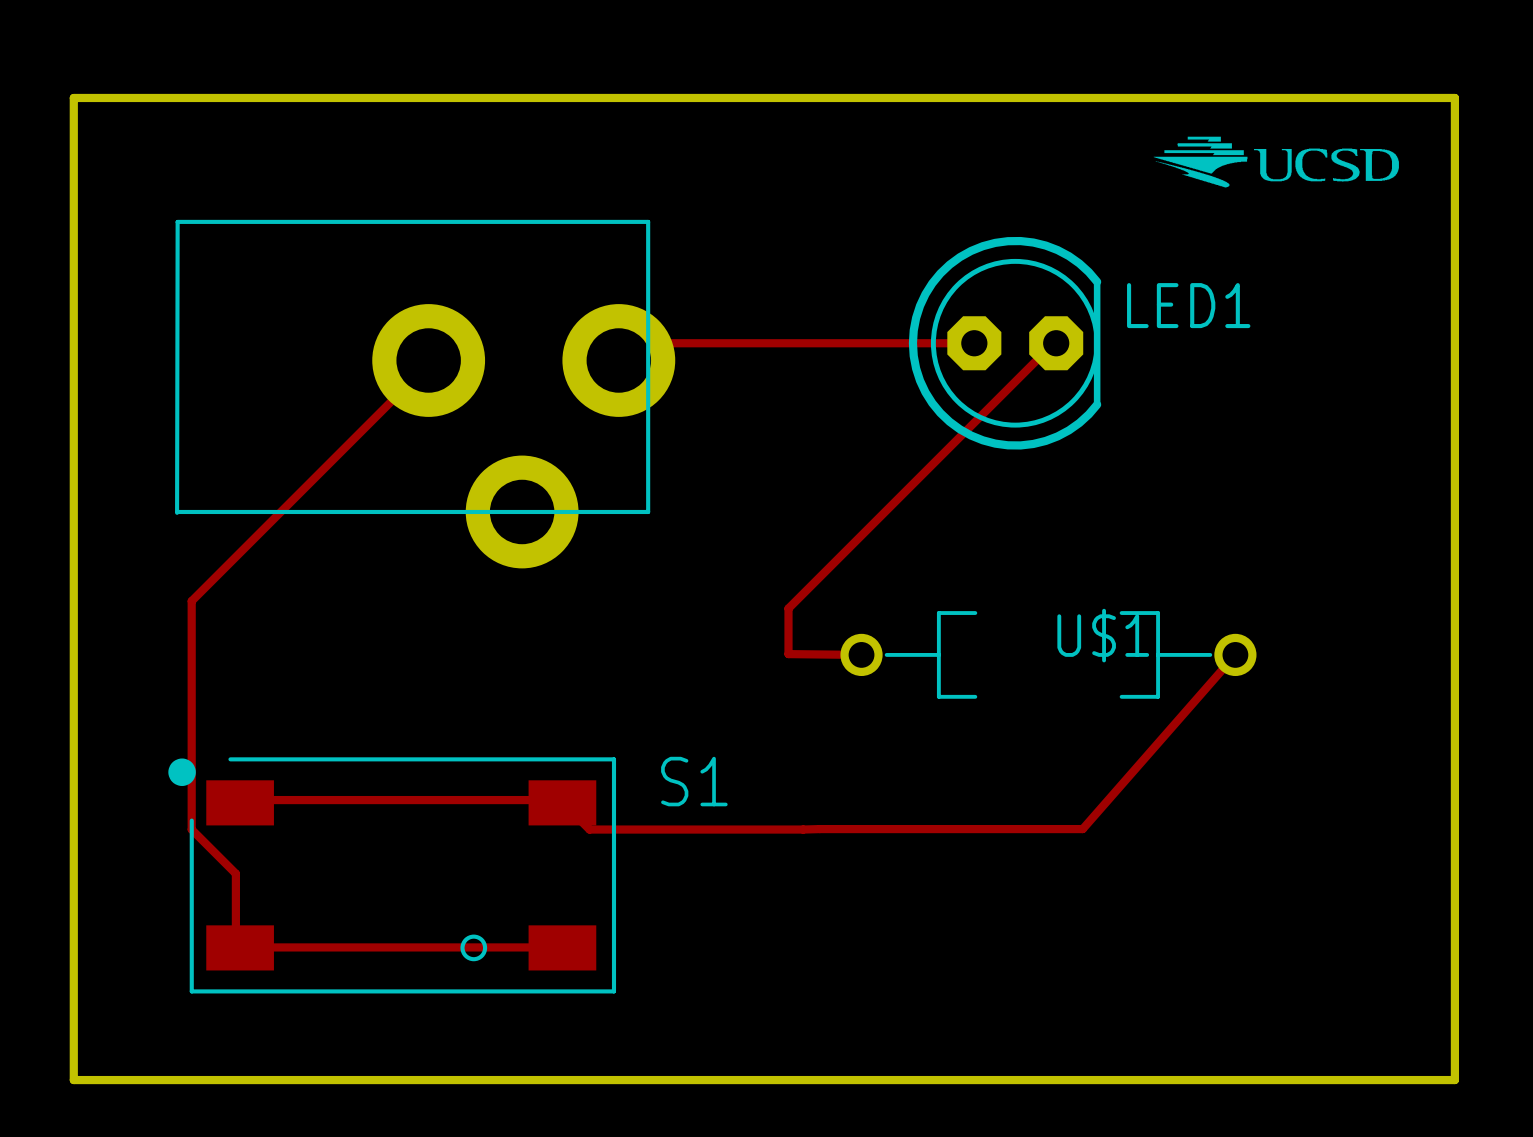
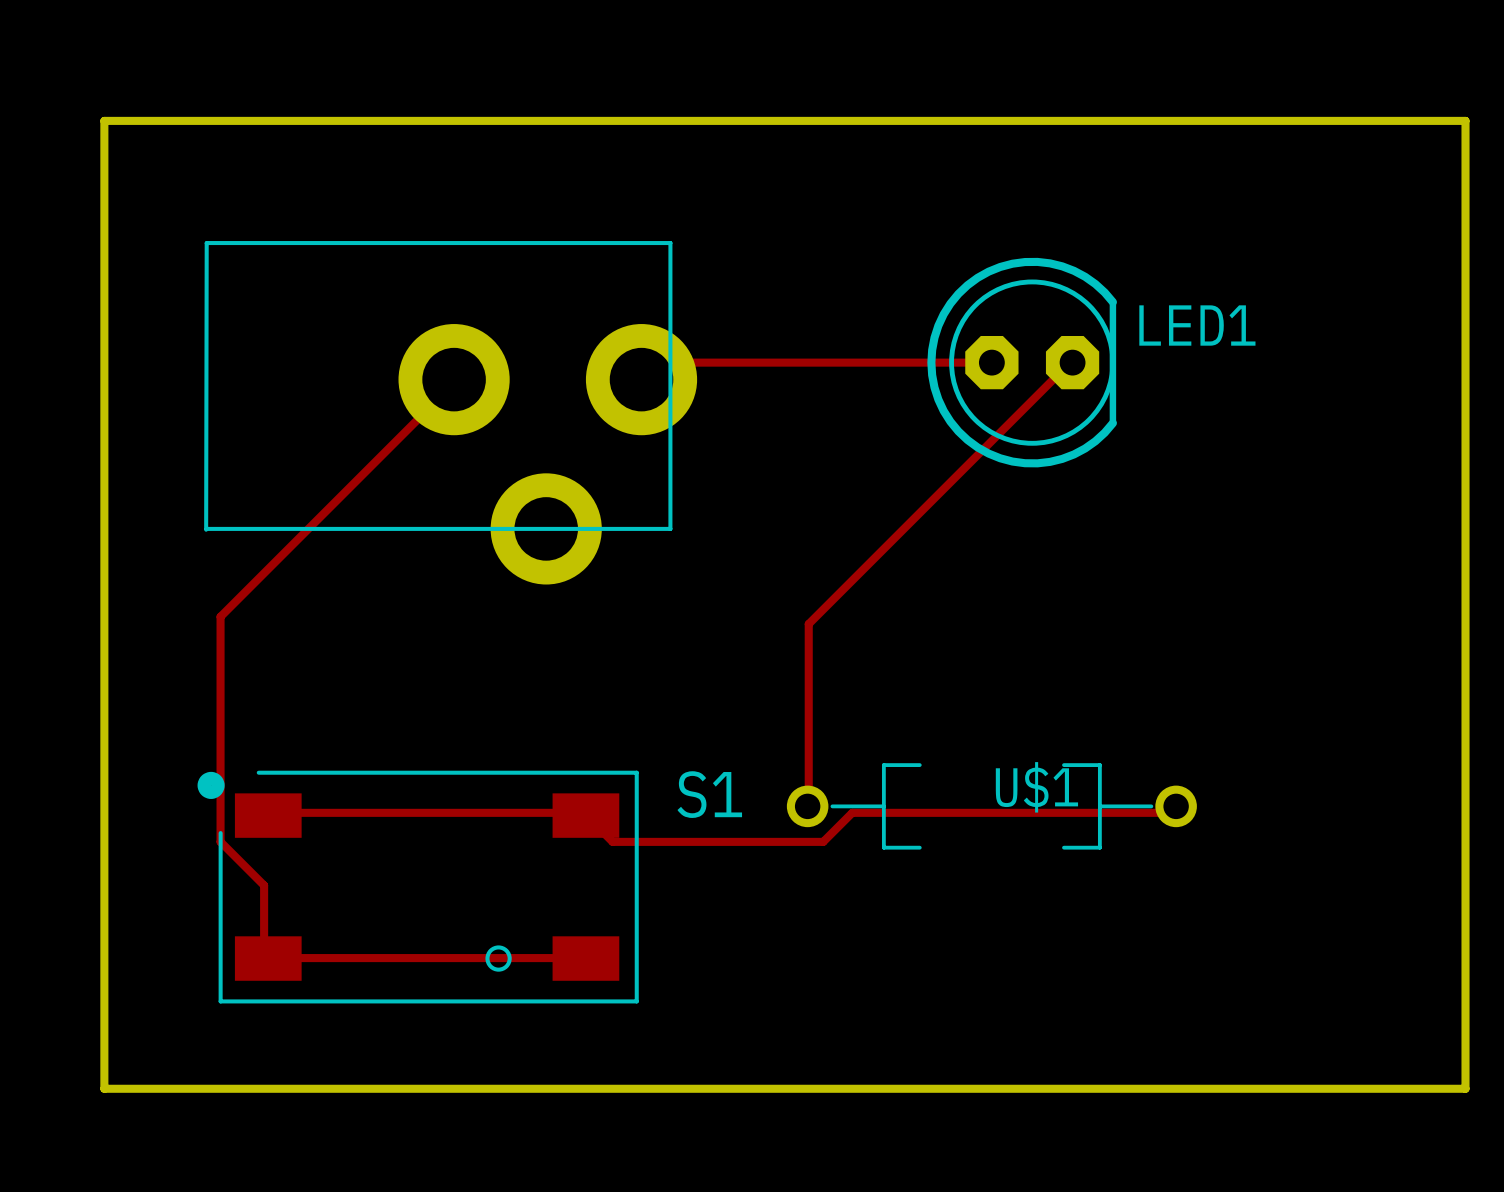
drawing: [1153, 136, 1399, 188] -> none
top track: (788, 654) (861, 654) -> (808, 668) (807, 806)
U$1 position: (1048, 654) -> (991, 806)
top track: (1235, 654) (1082, 829) (803, 829) -> (1176, 806) (1171, 812) (852, 812) (823, 841)

